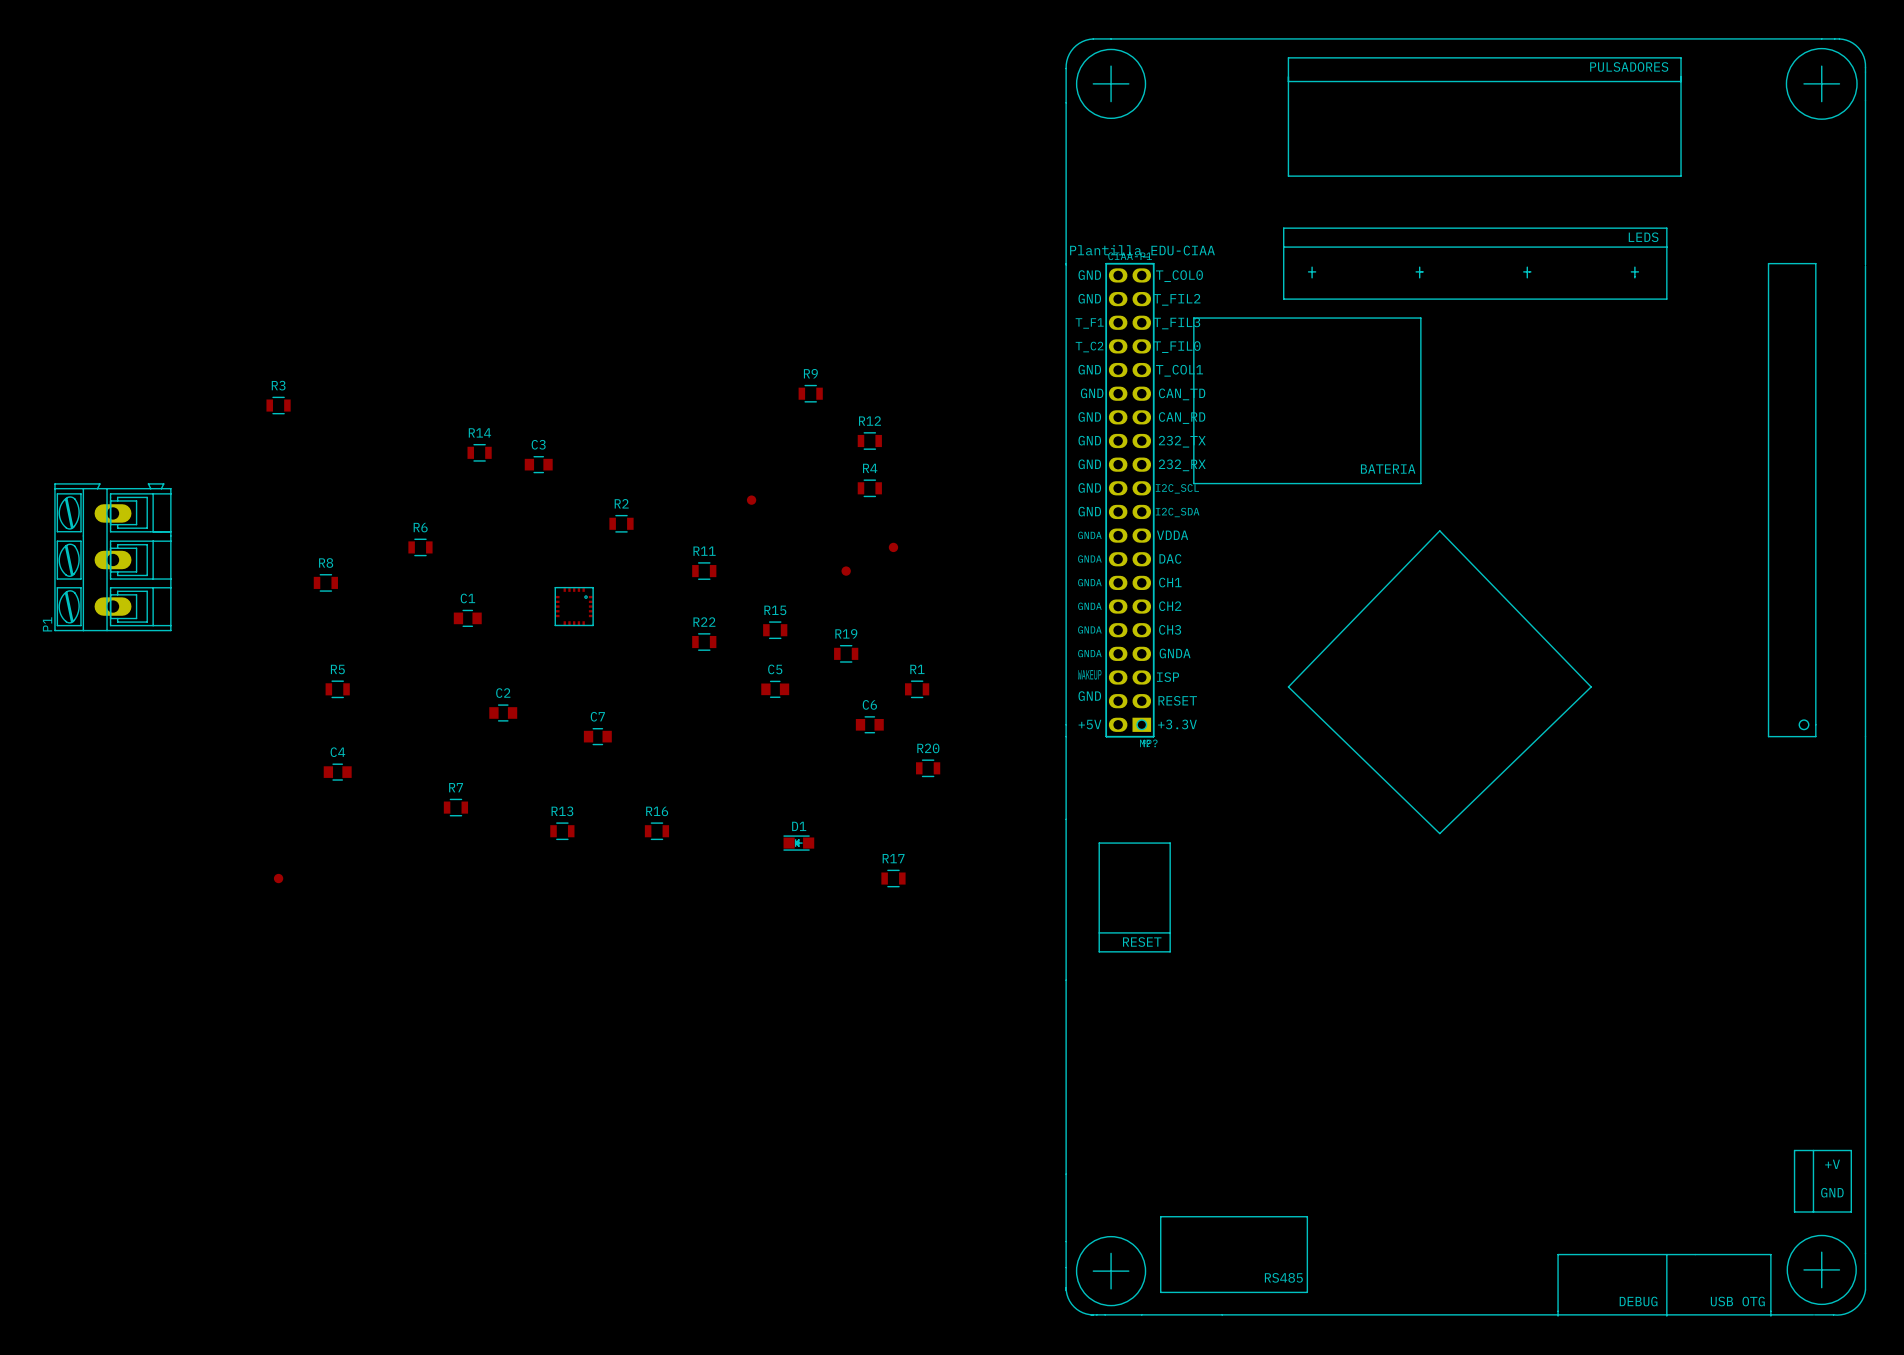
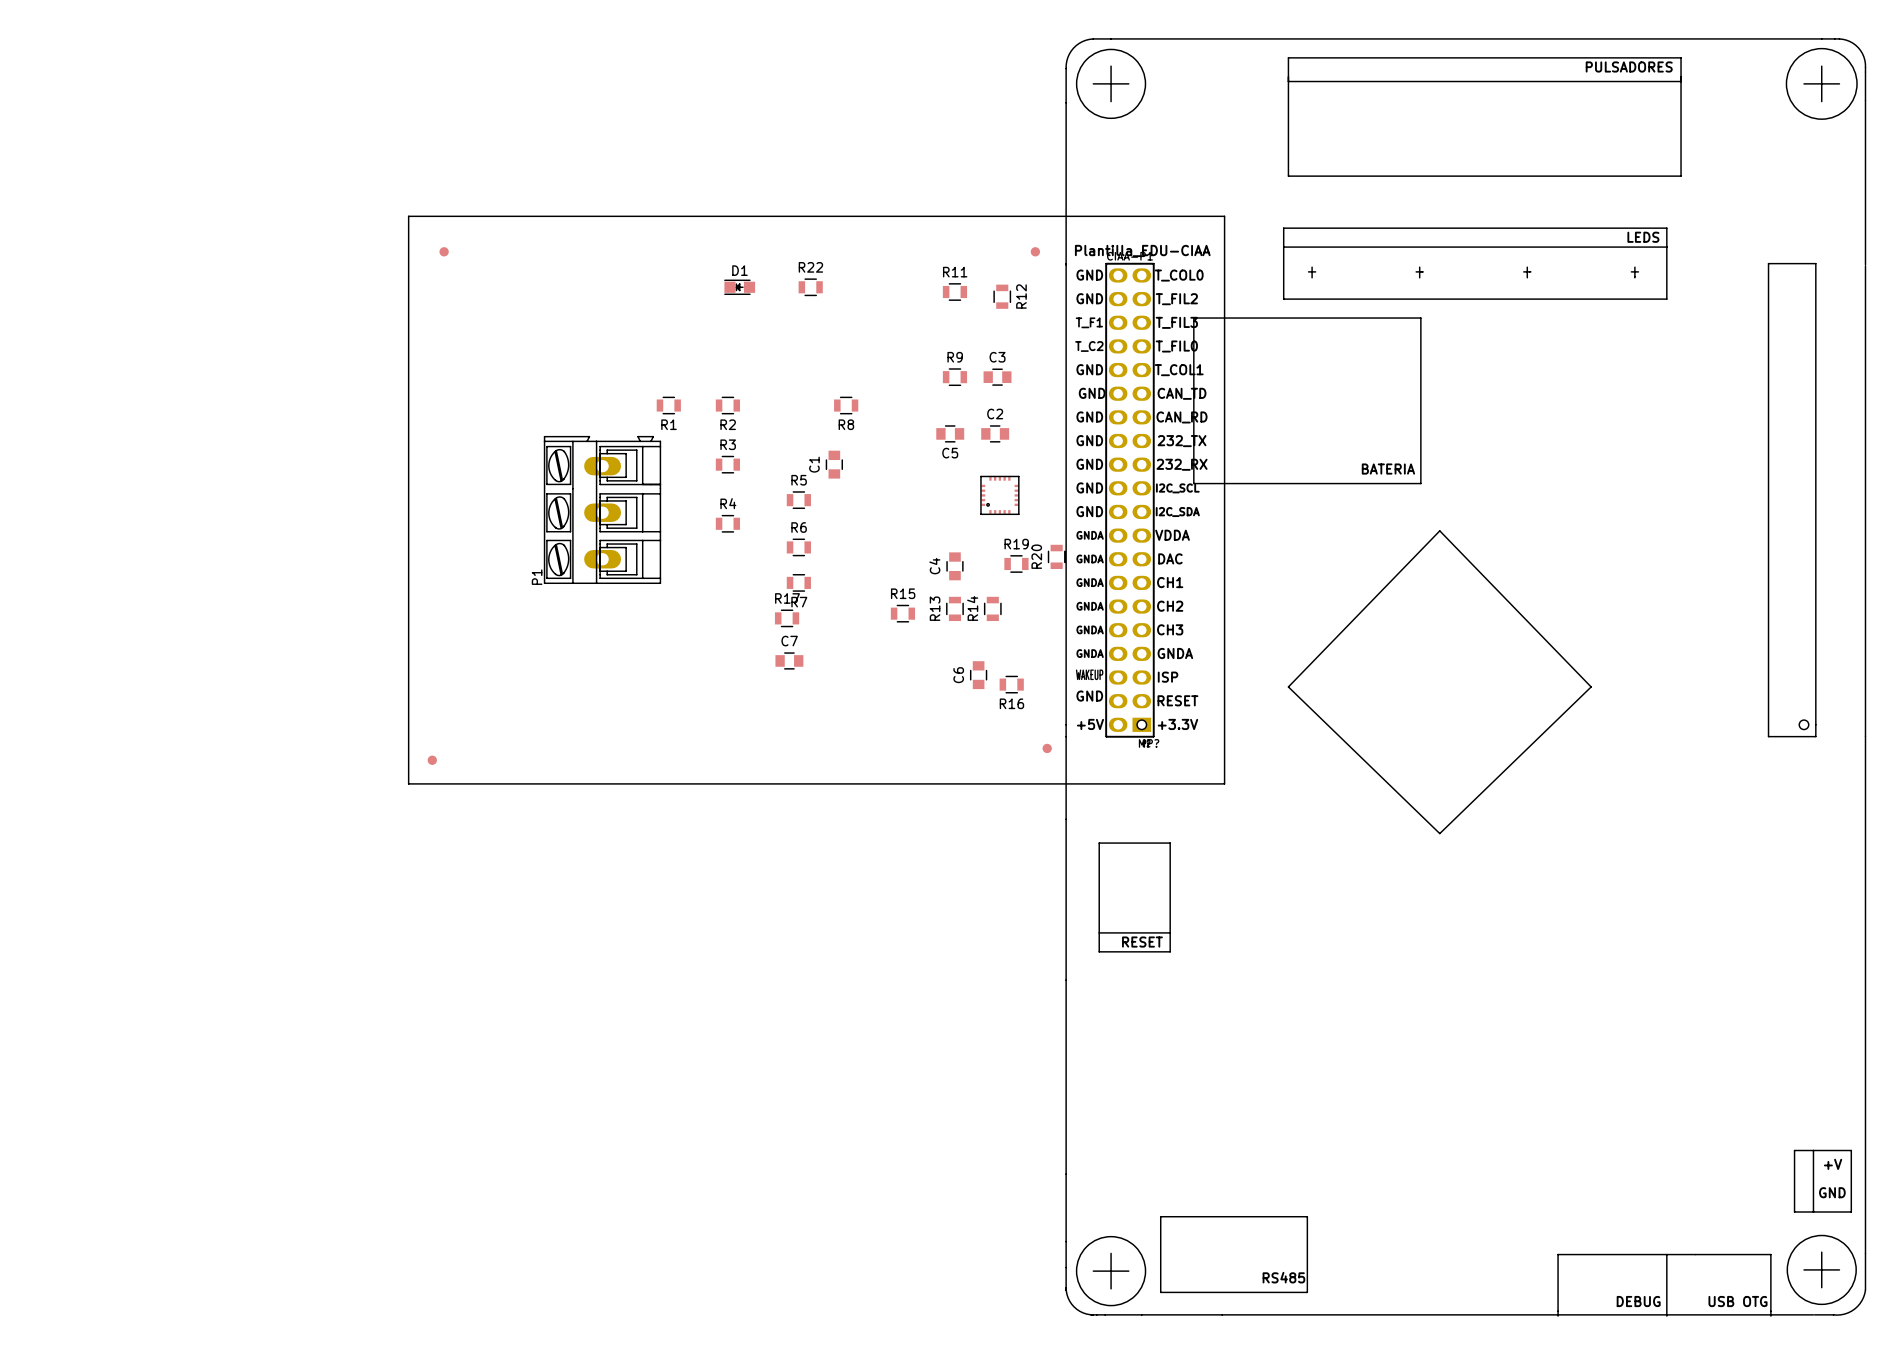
board edge: none -> (408, 216) (1224, 216) (1224, 783) (408, 783) (408, 216)
part: none -> (444, 251)
part: none -> (1035, 251)
R9 position: (810, 393) -> (954, 377)
R3 position: (278, 405) -> (727, 464)
R14 name position: R14 (479, 432) -> R14 (972, 608)
R12 rotation: 0° (869, 441) -> 90° clockwise (1002, 296)
R12 position: (869, 441) -> (1002, 296)
R14 rotation: 0° (479, 452) -> 90° clockwise (992, 608)
R14 position: (479, 452) -> (992, 608)
C3 position: (538, 464) -> (997, 377)
R4 position: (869, 488) -> (727, 523)
part: none -> (999, 495)
part: (751, 500) -> none
R2 name position: R2 (621, 503) -> R2 (728, 424)
R2 position: (621, 523) -> (727, 405)
R6 position: (420, 547) -> (798, 547)
part: (893, 547) -> none
P1 position: (112, 557) -> (602, 509)
R8 name position: R8 (326, 563) -> R8 (846, 424)
R11 position: (704, 571) -> (954, 292)
part: (846, 571) -> none
R8 position: (325, 582) -> (846, 405)
C1 name position: C1 (467, 598) -> C1 (814, 464)
part: (574, 606) -> none
C1 rotation: 0° (467, 618) -> 90° clockwise (834, 464)
C1 position: (467, 618) -> (834, 464)
R15 position: (775, 630) -> (902, 613)
R22 position: (704, 642) -> (810, 287)
R19 position: (846, 653) -> (1016, 563)
C5 name position: C5 (775, 669) -> C5 (950, 453)
R1 name position: R1 (917, 669) -> R1 (669, 424)
R5 position: (337, 689) -> (798, 500)
C5 position: (775, 689) -> (950, 433)
R1 position: (917, 689) -> (668, 405)
C6 name position: C6 (869, 704) -> C6 (958, 675)
C2 position: (503, 712) -> (995, 433)
C6 rotation: 0° (869, 724) -> 90° clockwise (978, 675)
C6 position: (869, 724) -> (978, 675)
C7 position: (597, 736) -> (789, 660)
R20 name position: R20 (928, 748) -> R20 (1036, 556)
part: none -> (1047, 748)
C4 name position: C4 (337, 752) -> C4 (934, 566)
R20 rotation: 0° (928, 768) -> 90° clockwise (1056, 556)
R20 position: (928, 768) -> (1056, 556)
C4 rotation: 0° (337, 772) -> 90° clockwise (954, 566)
C4 position: (337, 772) -> (954, 566)
R7 name position: R7 (456, 787) -> R7 (799, 602)
R7 position: (455, 807) -> (798, 582)
R13 name position: R13 (562, 811) -> R13 (935, 608)
R16 name position: R16 (657, 811) -> R16 (1011, 703)
R13 rotation: 0° (562, 831) -> 90° clockwise (954, 608)
R13 position: (562, 831) -> (954, 608)
R16 position: (656, 831) -> (1011, 684)
D1 position: (798, 843) -> (739, 287)
part position: (278, 878) -> (432, 760)
R17 position: (893, 878) -> (787, 618)

